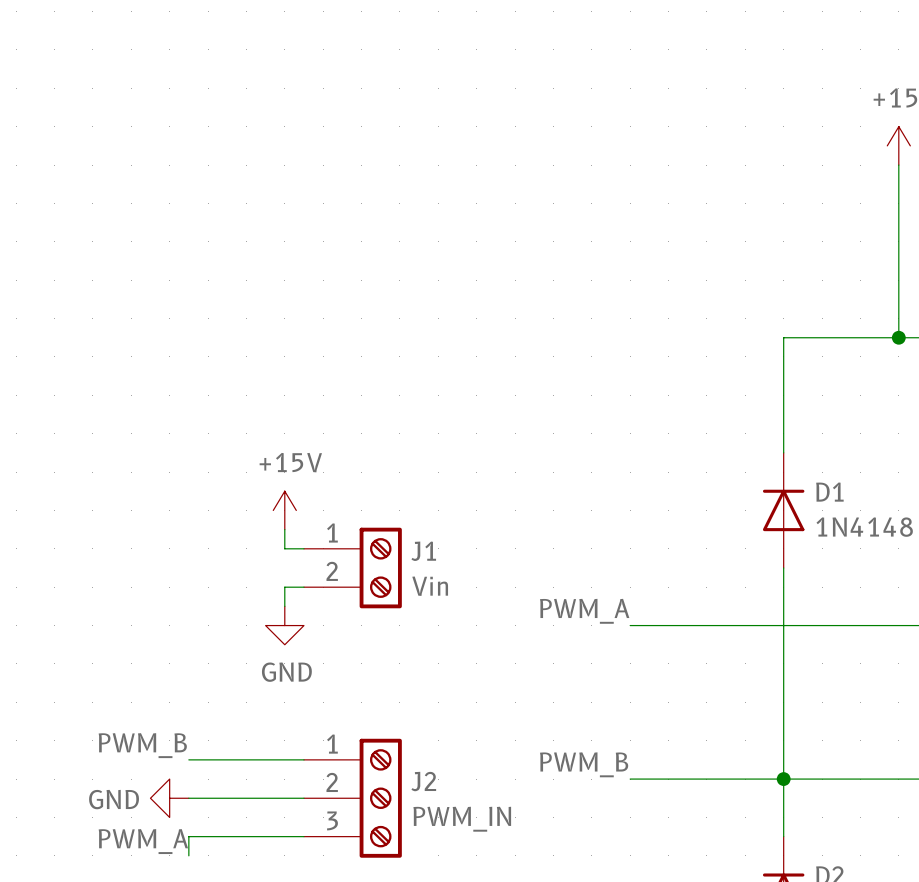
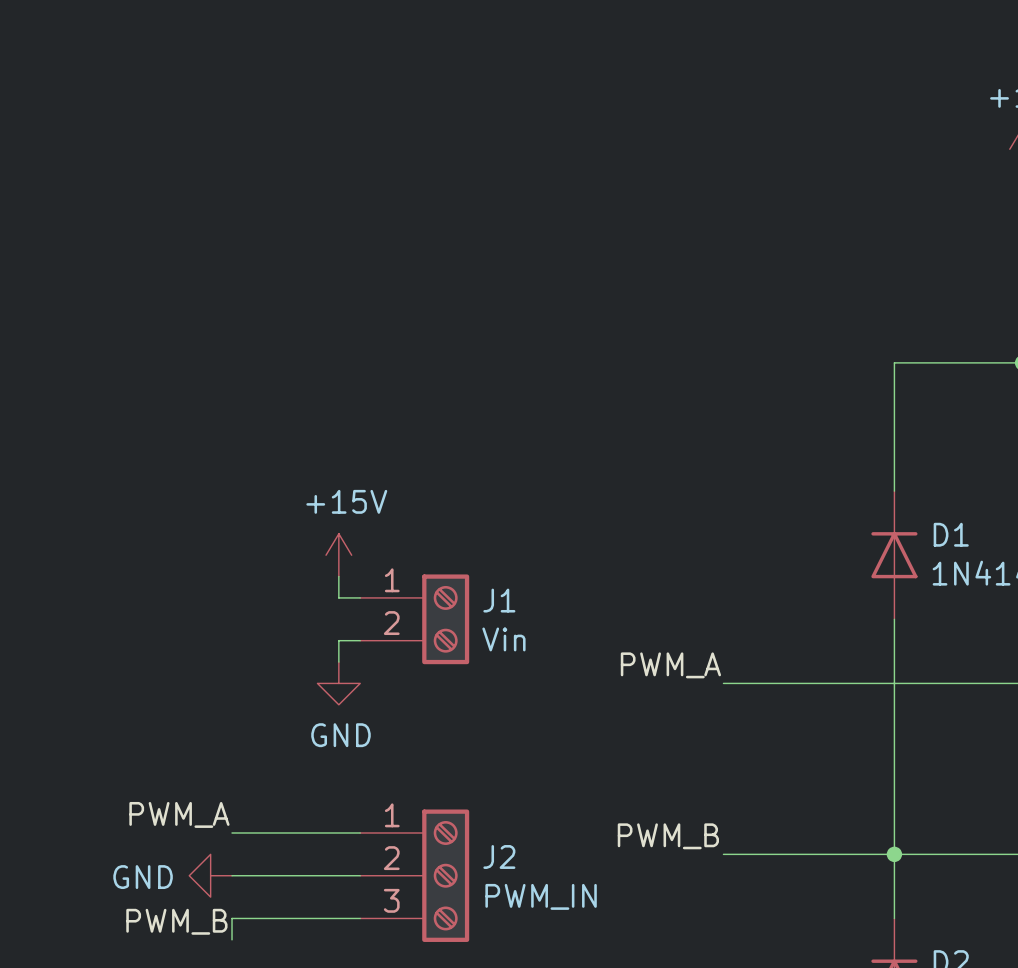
label: PWM_B (142, 745) -> PWM_A (179, 814)
label: PWM_A (143, 841) -> PWM_B (176, 921)

